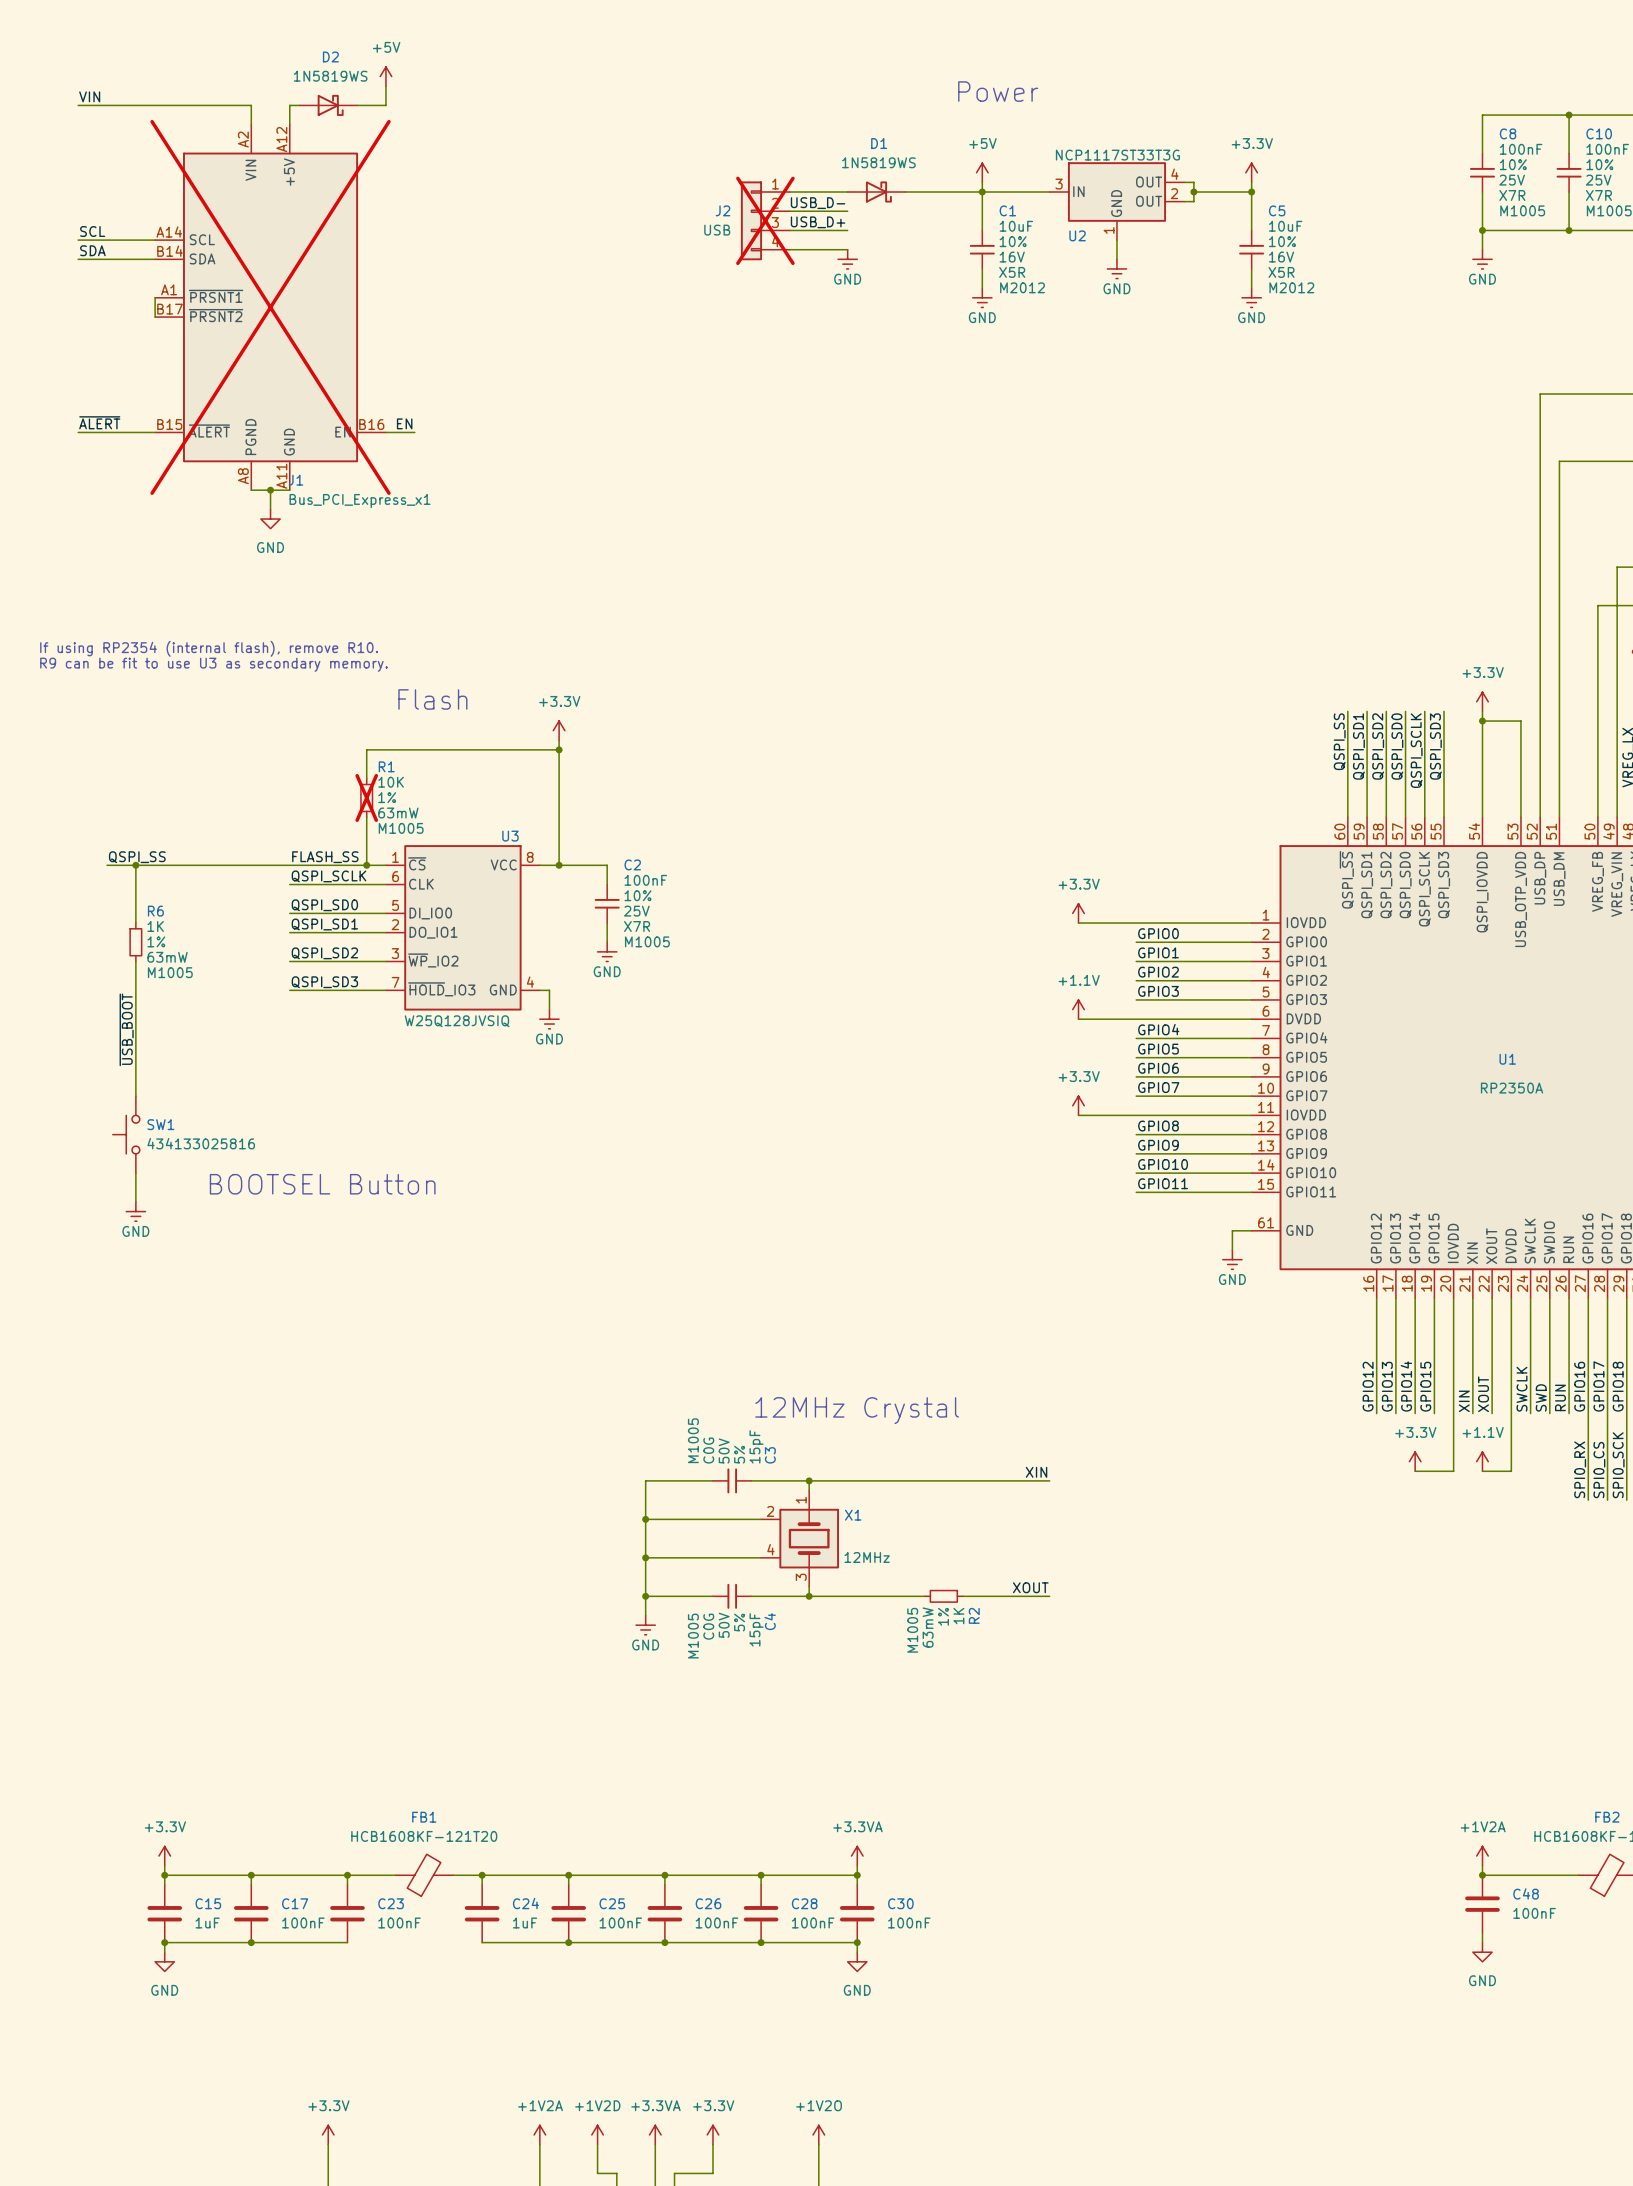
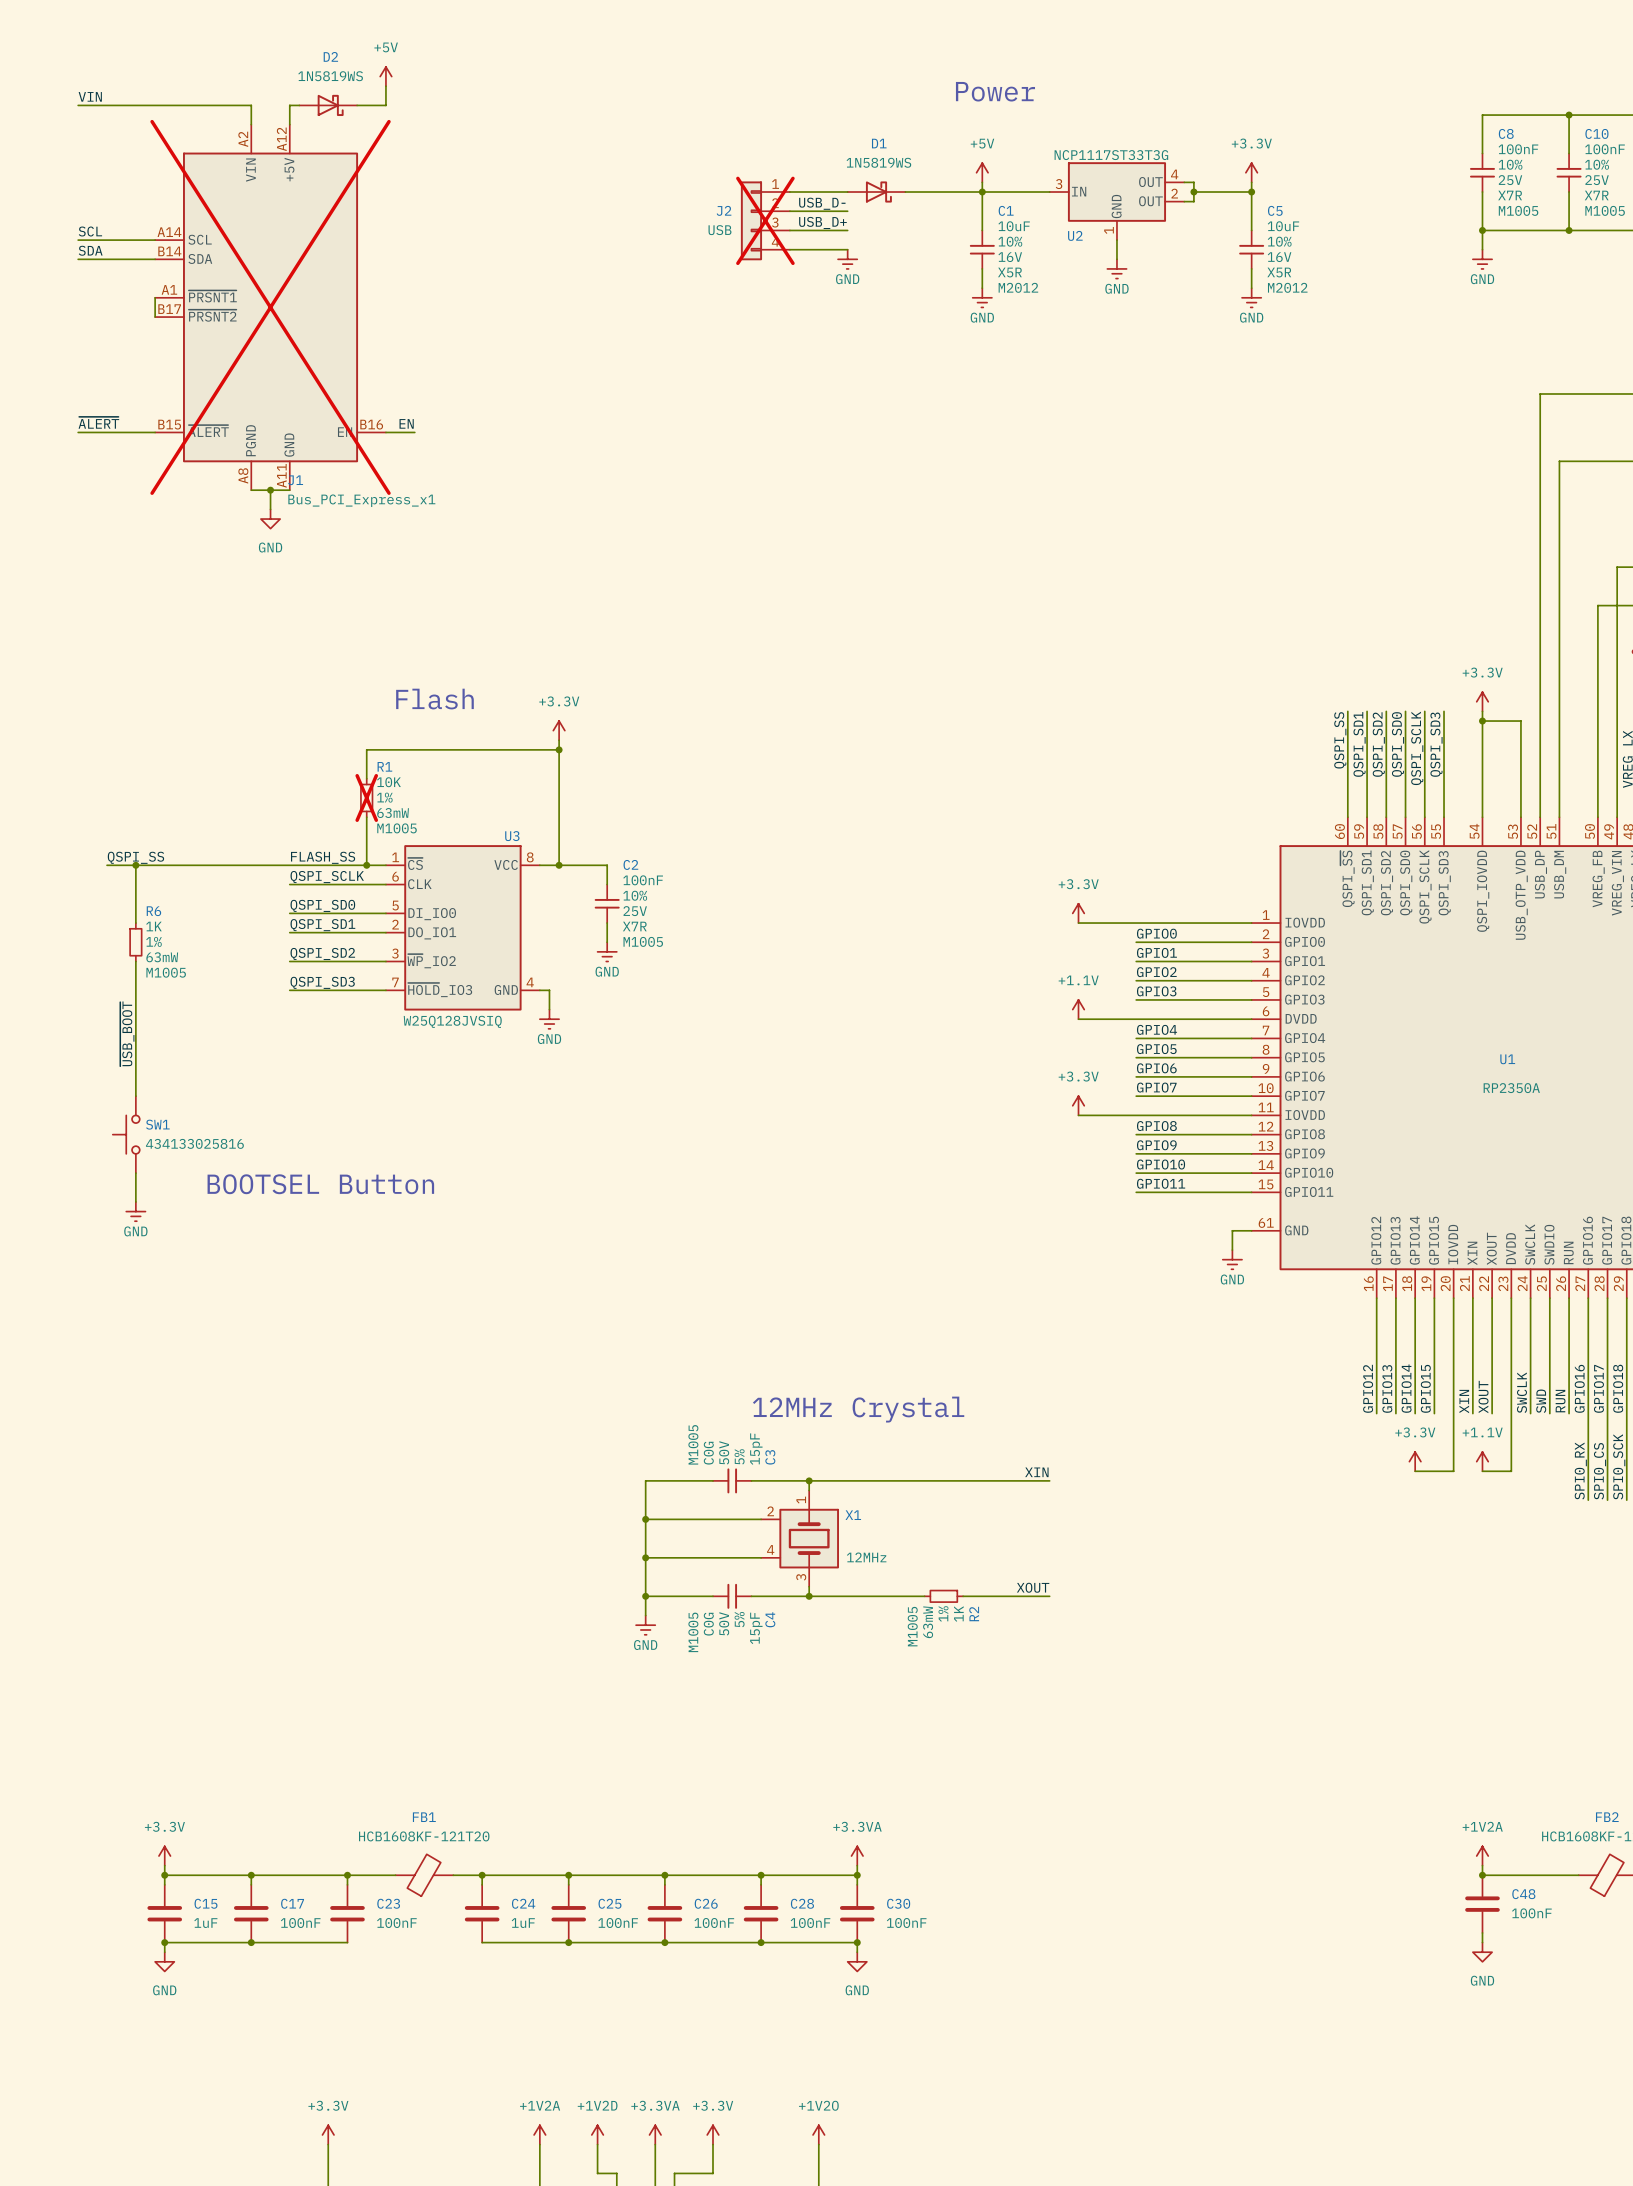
text: If using RP2354 (internal flash), remove R10. (209, 648) -> none
text: R9 can be fit to use U3 as secondary memory. (213, 664) -> none

